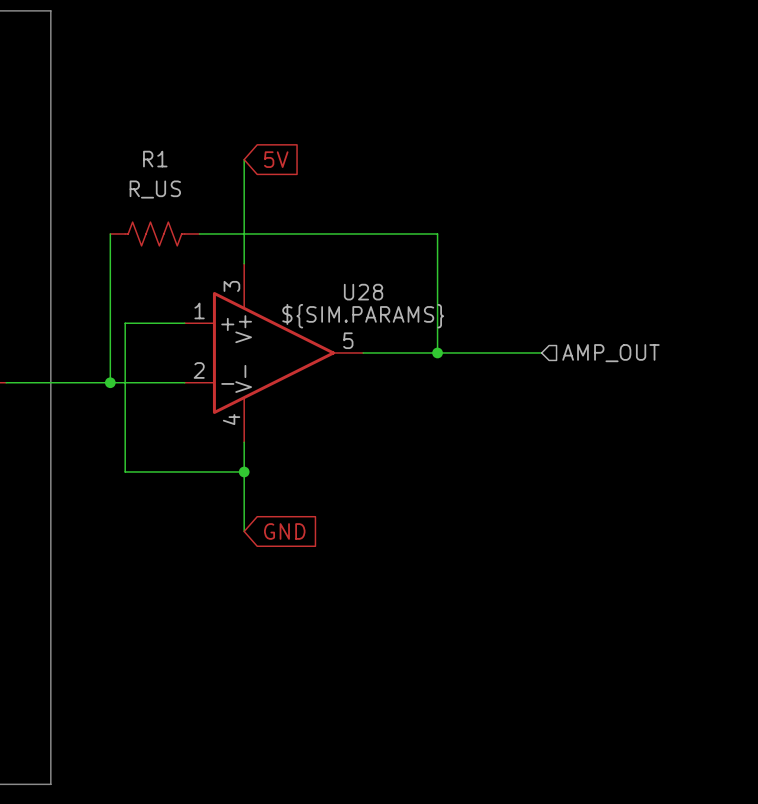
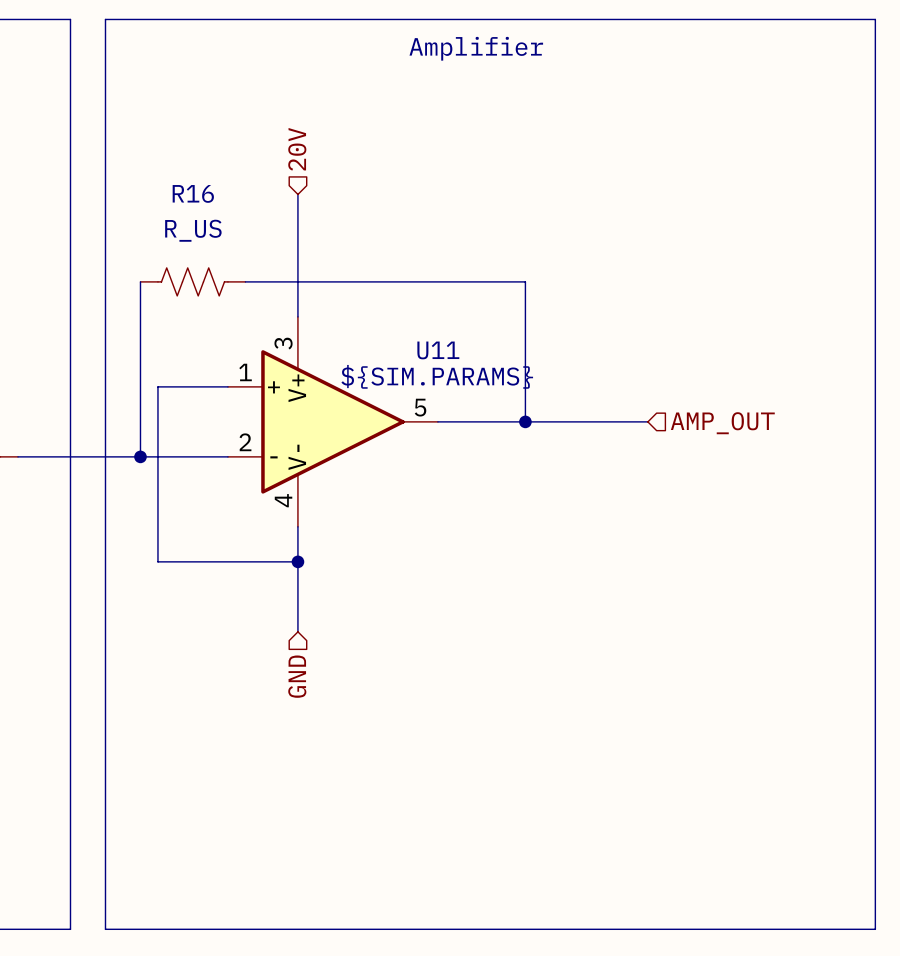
line: none -> (105, 19) (875, 19) (875, 929) (105, 929) (105, 19)
text: none -> Amplifier (476, 48)
hierarchical label: none -> 20V (297, 149)
R1 name: R1 (155, 159) -> R16 (193, 193)
global label: 5V (276, 159) -> none
U28 name: U28 (363, 292) -> U11 (438, 350)
global label: GND (284, 531) -> none
hierarchical label: none -> GND (297, 676)

